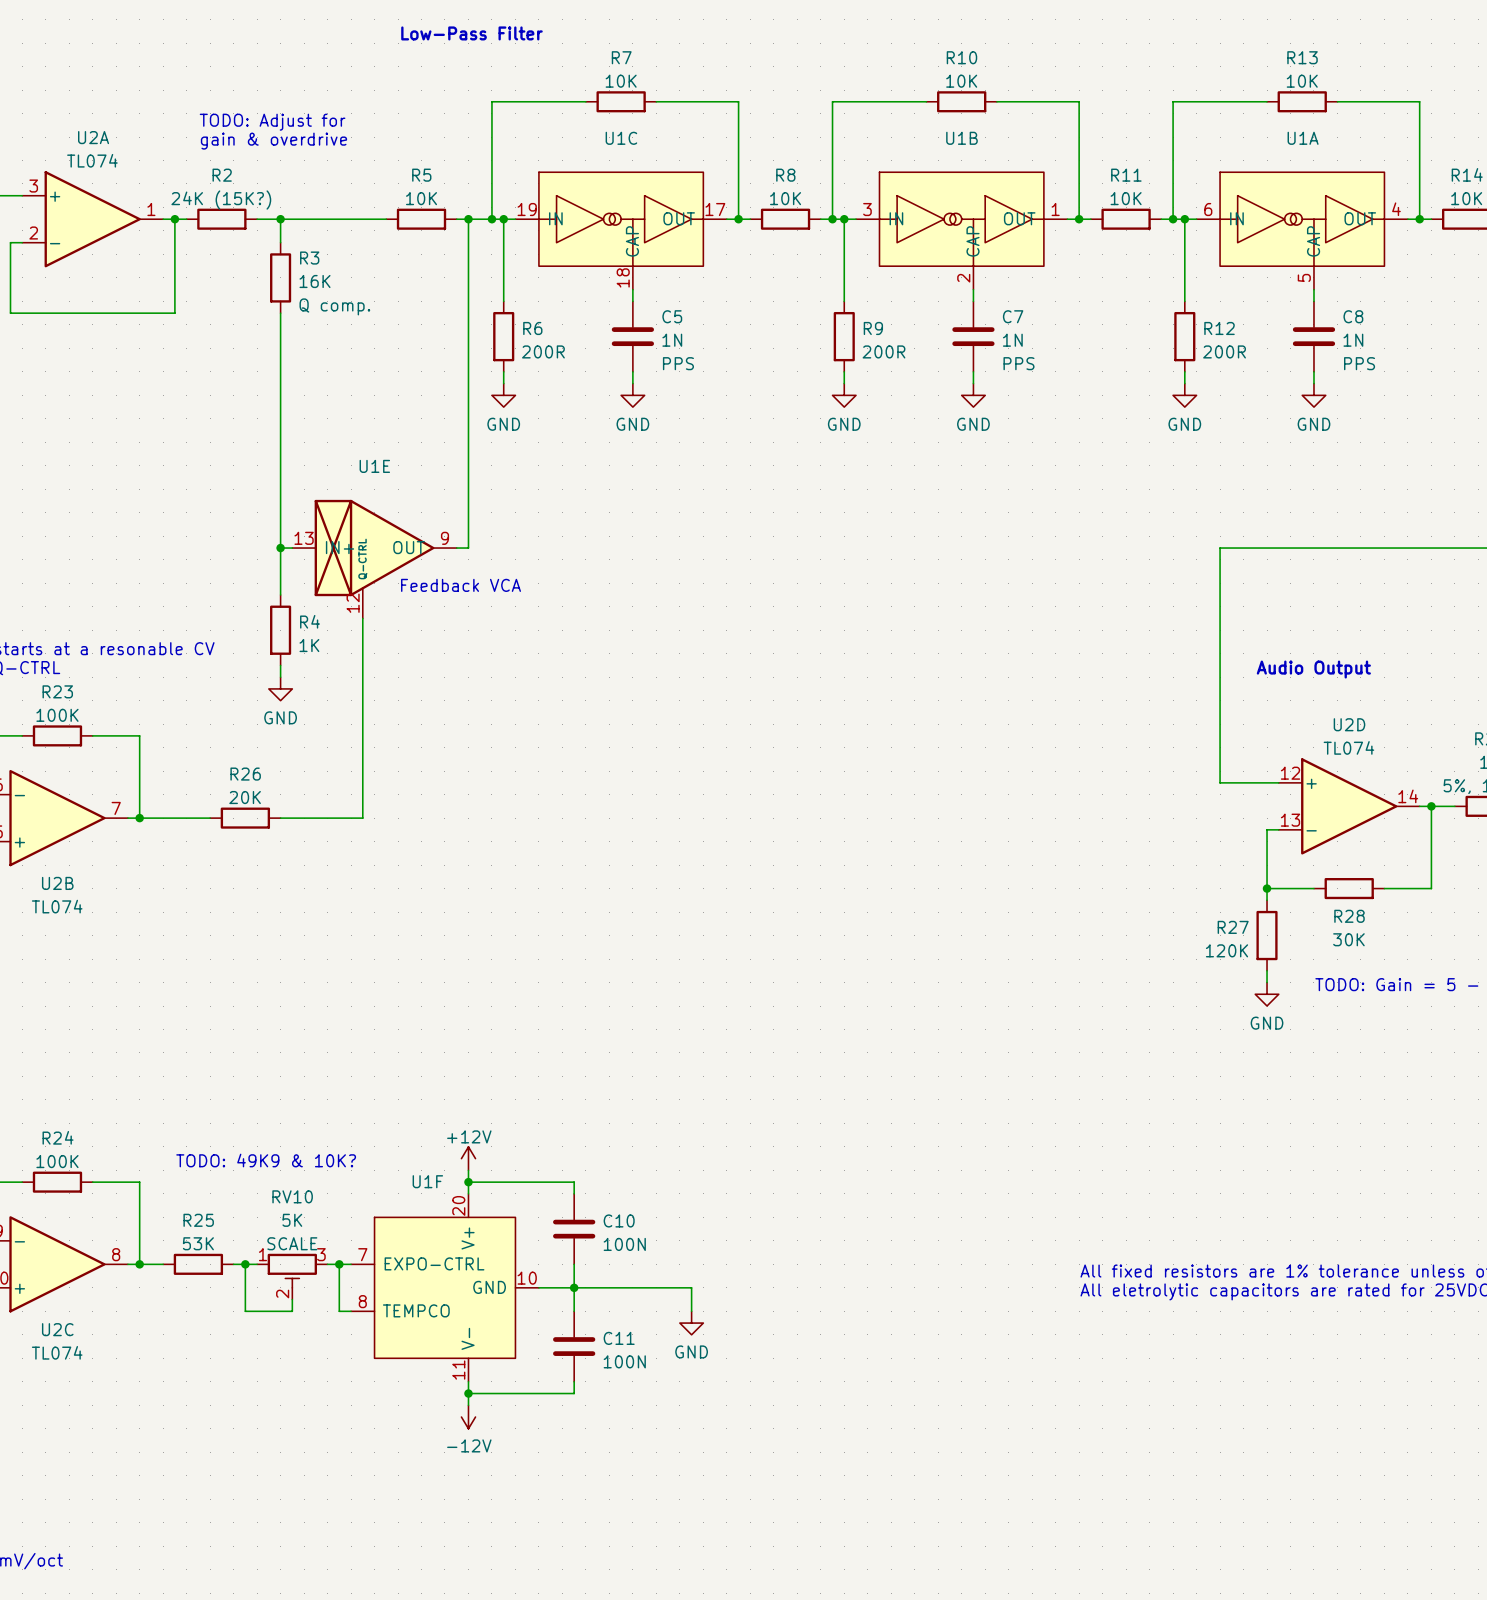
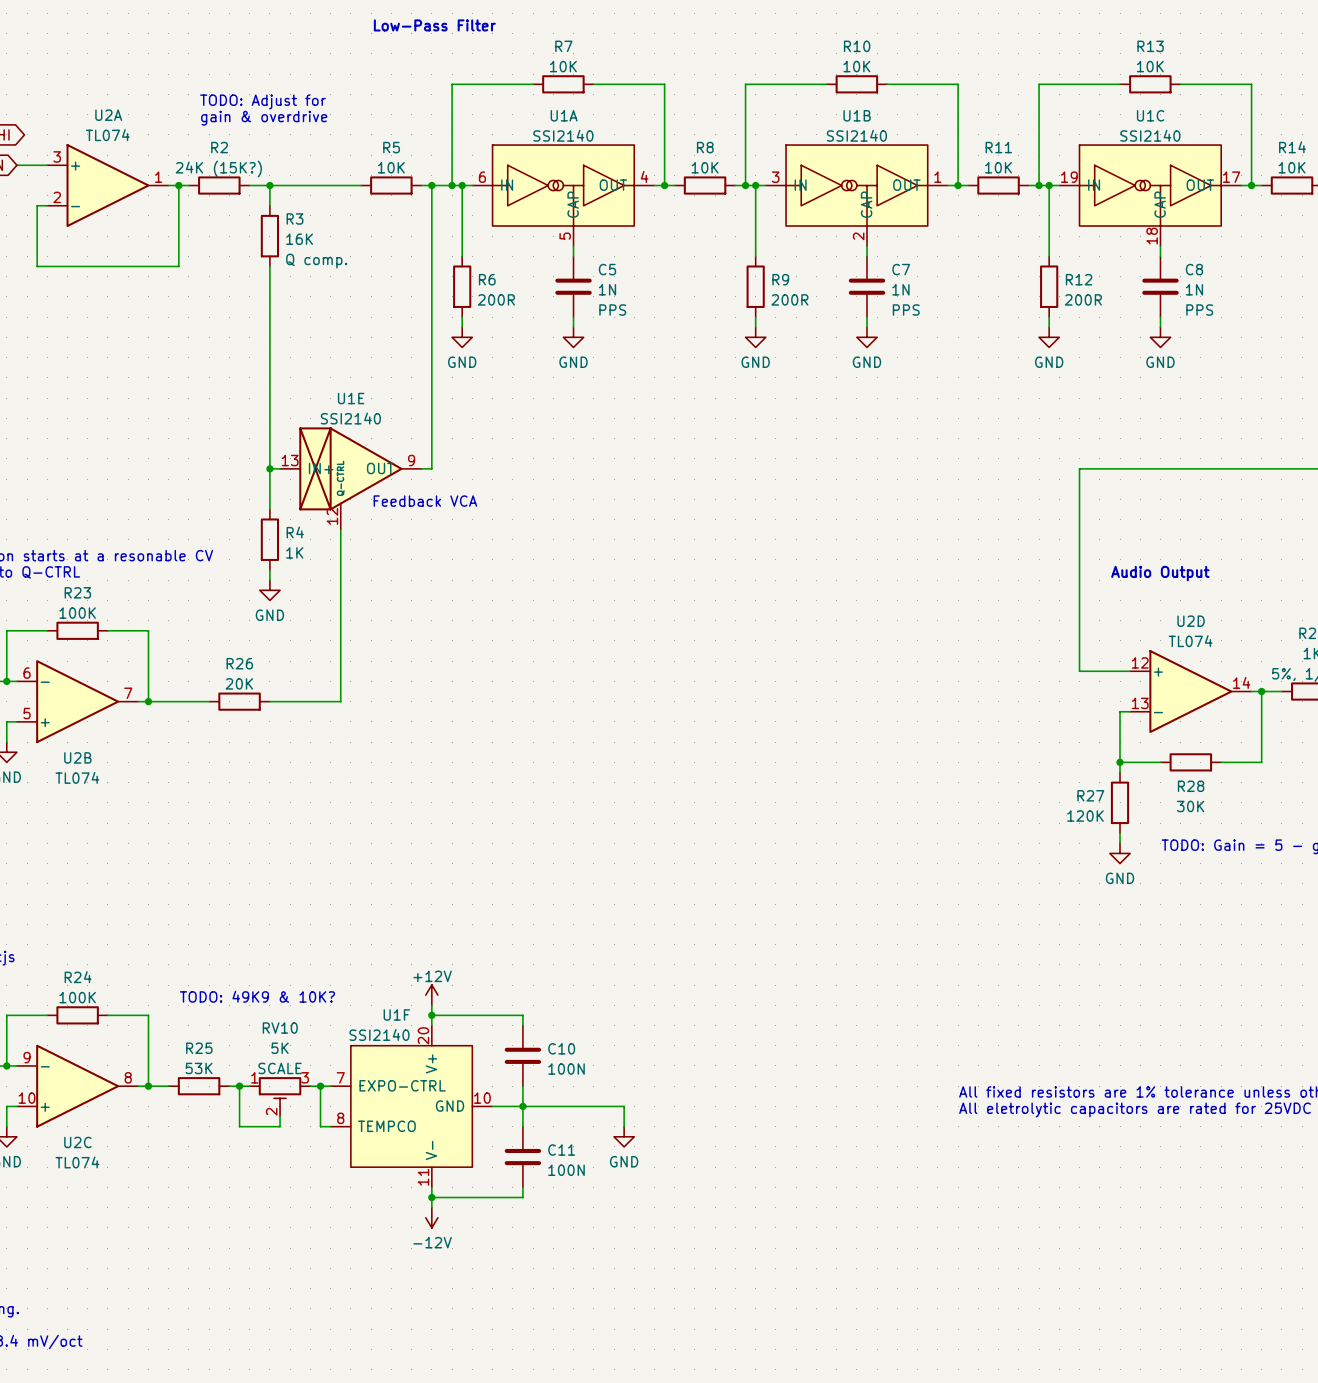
U1A value: none -> SSI2140 (563, 135)
U1B value: none -> SSI2140 (856, 135)
U1C value: none -> SSI2140 (1150, 135)
U1C position: (621, 230) -> (1150, 195)
U1A position: (1302, 230) -> (563, 195)
U1E value: none -> SSI2140 (350, 418)
U1F value: none -> SSI2140 (379, 1034)

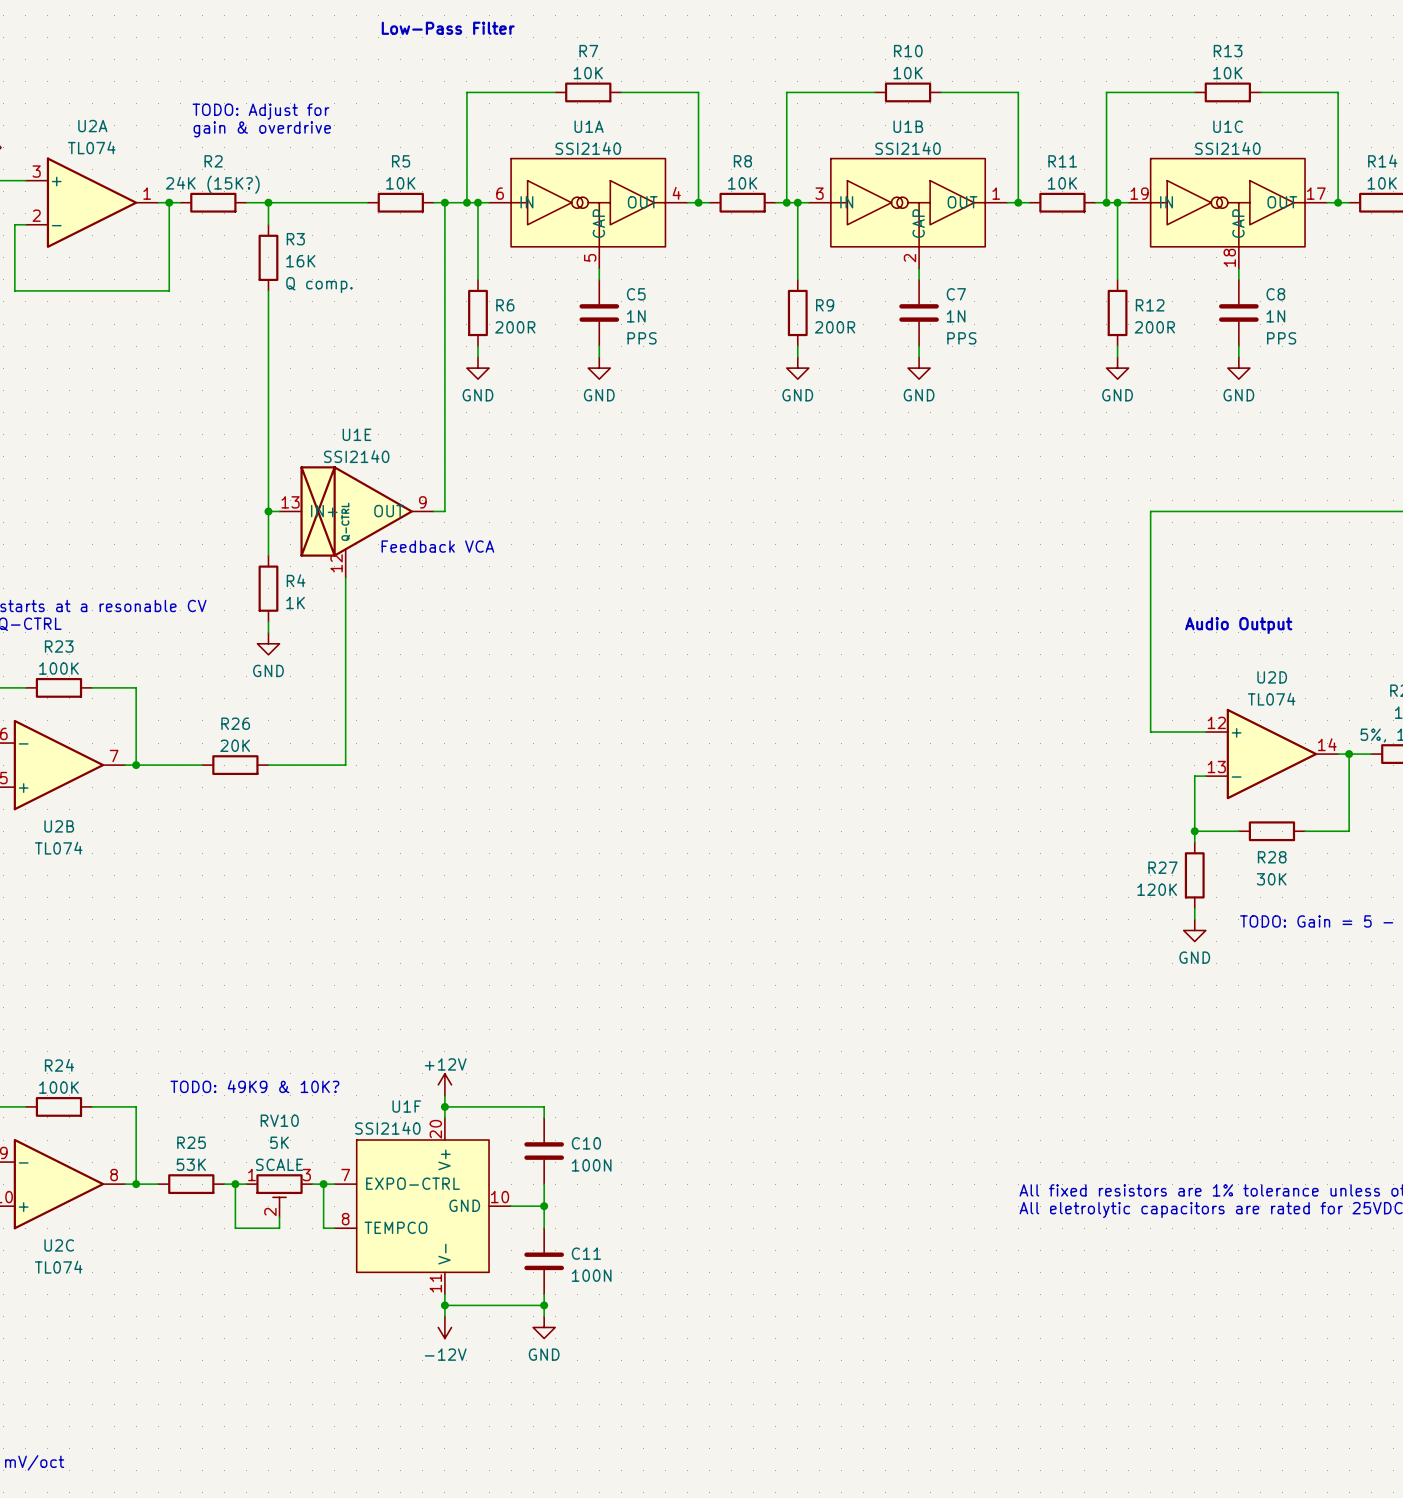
wire: (522, 1106) (624, 1106) (624, 1126) -> none
power symbol position: GND (624, 1136) -> GND (544, 1327)
wire: none -> (544, 1305) (544, 1316)
junction: none -> (544, 1305)

